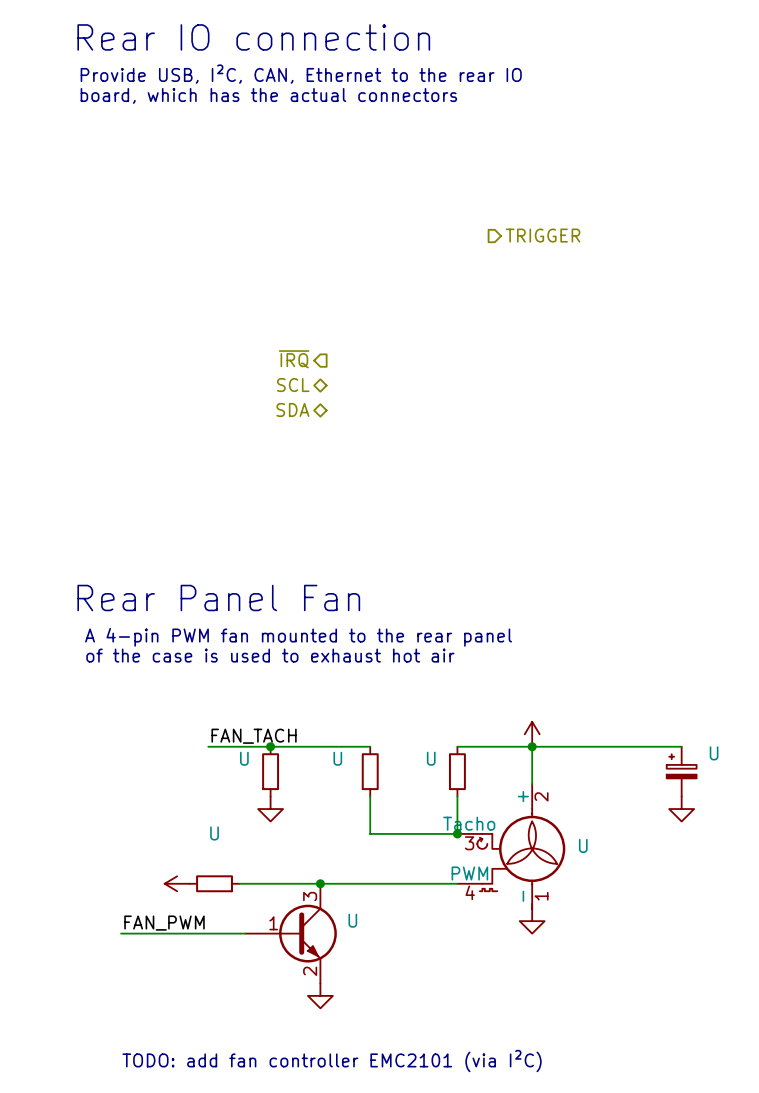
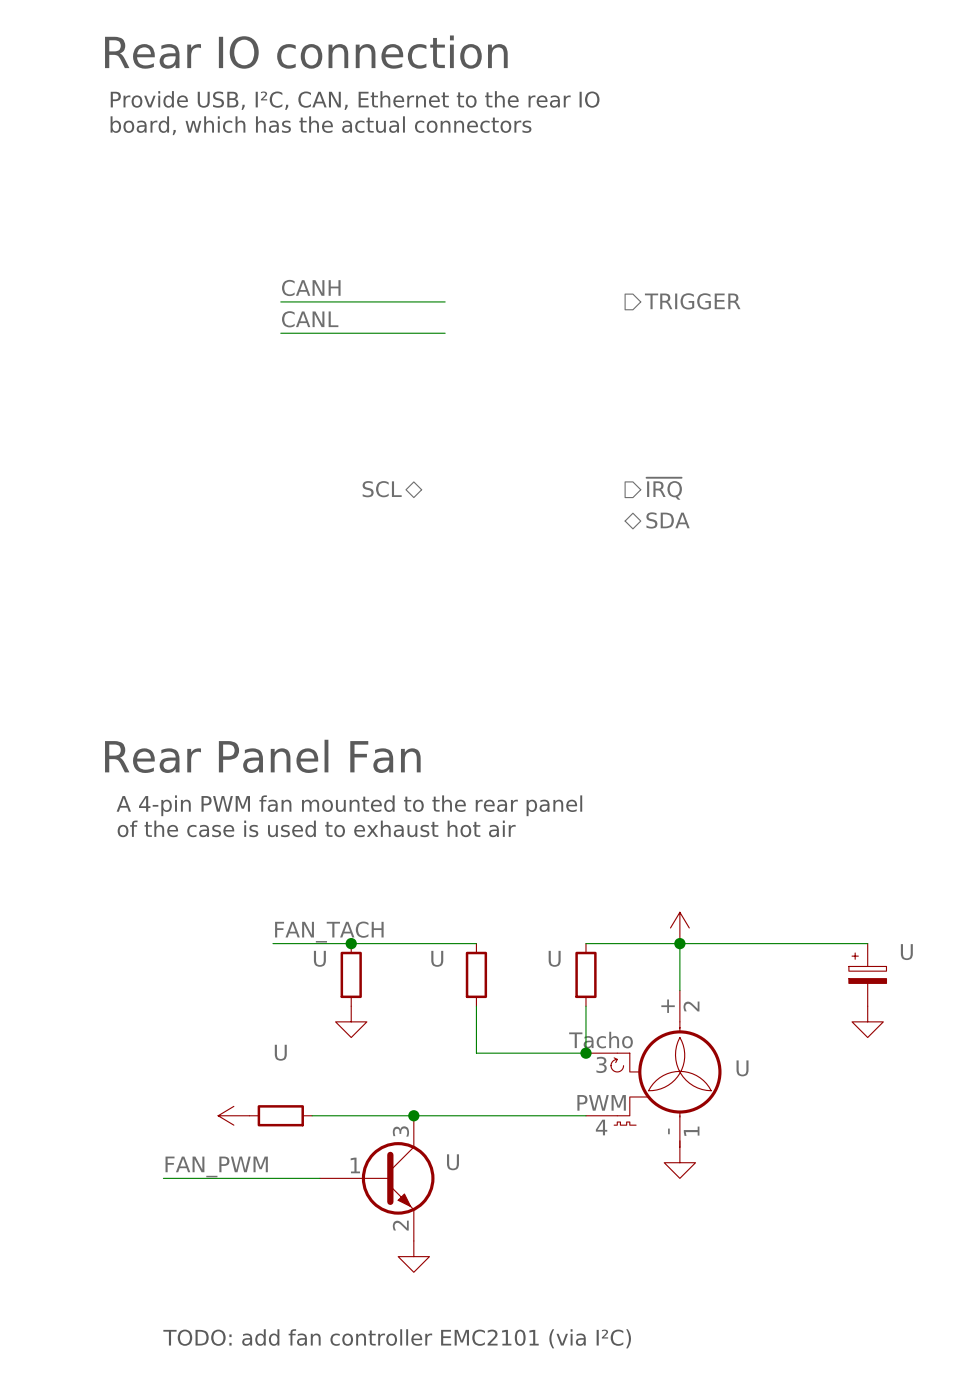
label: none -> CANH (311, 287)
wire: none -> (280, 301) (445, 301)
label: none -> CANL (310, 319)
wire: none -> (280, 333) (445, 333)
hierarchical label rotation: 0° (294, 359) -> 180° (664, 488)
hierarchical label position: ~{IRQ} (294, 359) -> ~{IRQ} (664, 488)
hierarchical label rotation: 0° (292, 409) -> 180° (668, 520)
hierarchical label position: SDA (292, 409) -> SDA (668, 520)

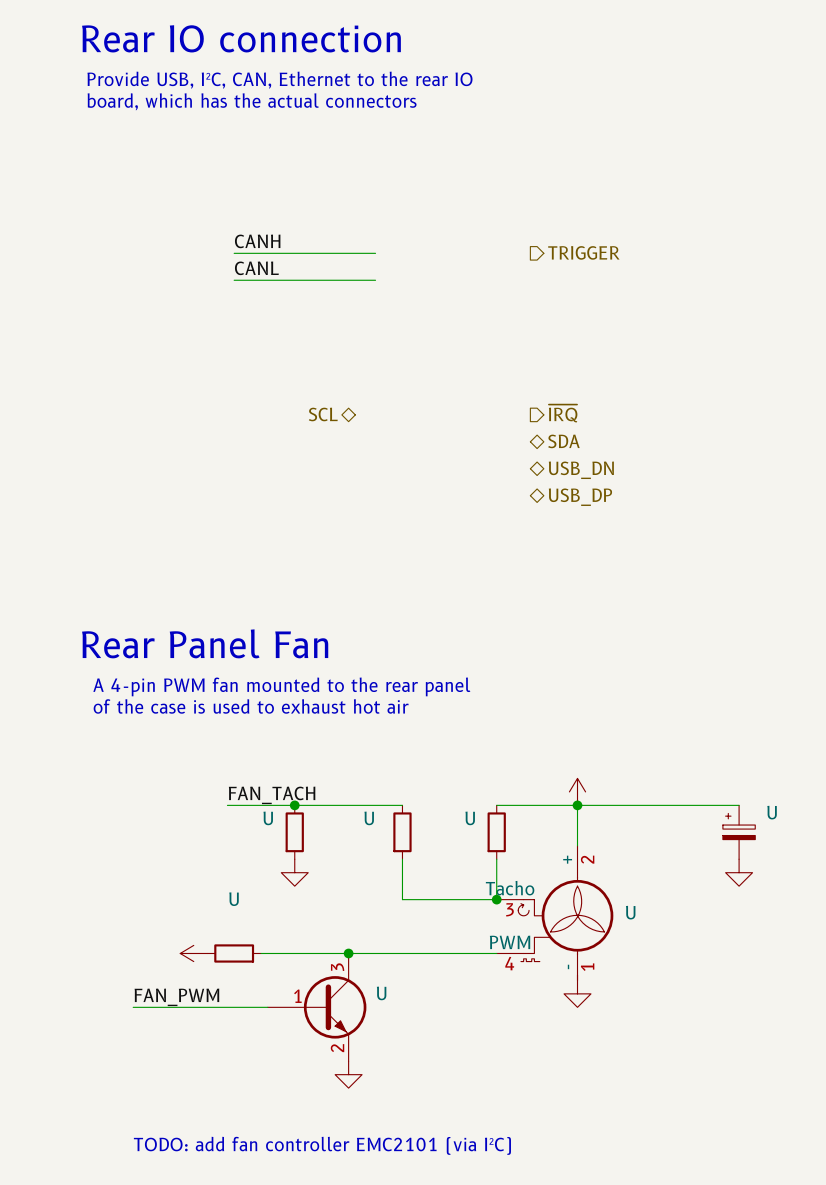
hierarchical label: none -> USB_DN (581, 470)
hierarchical label: none -> USB_DP (580, 497)

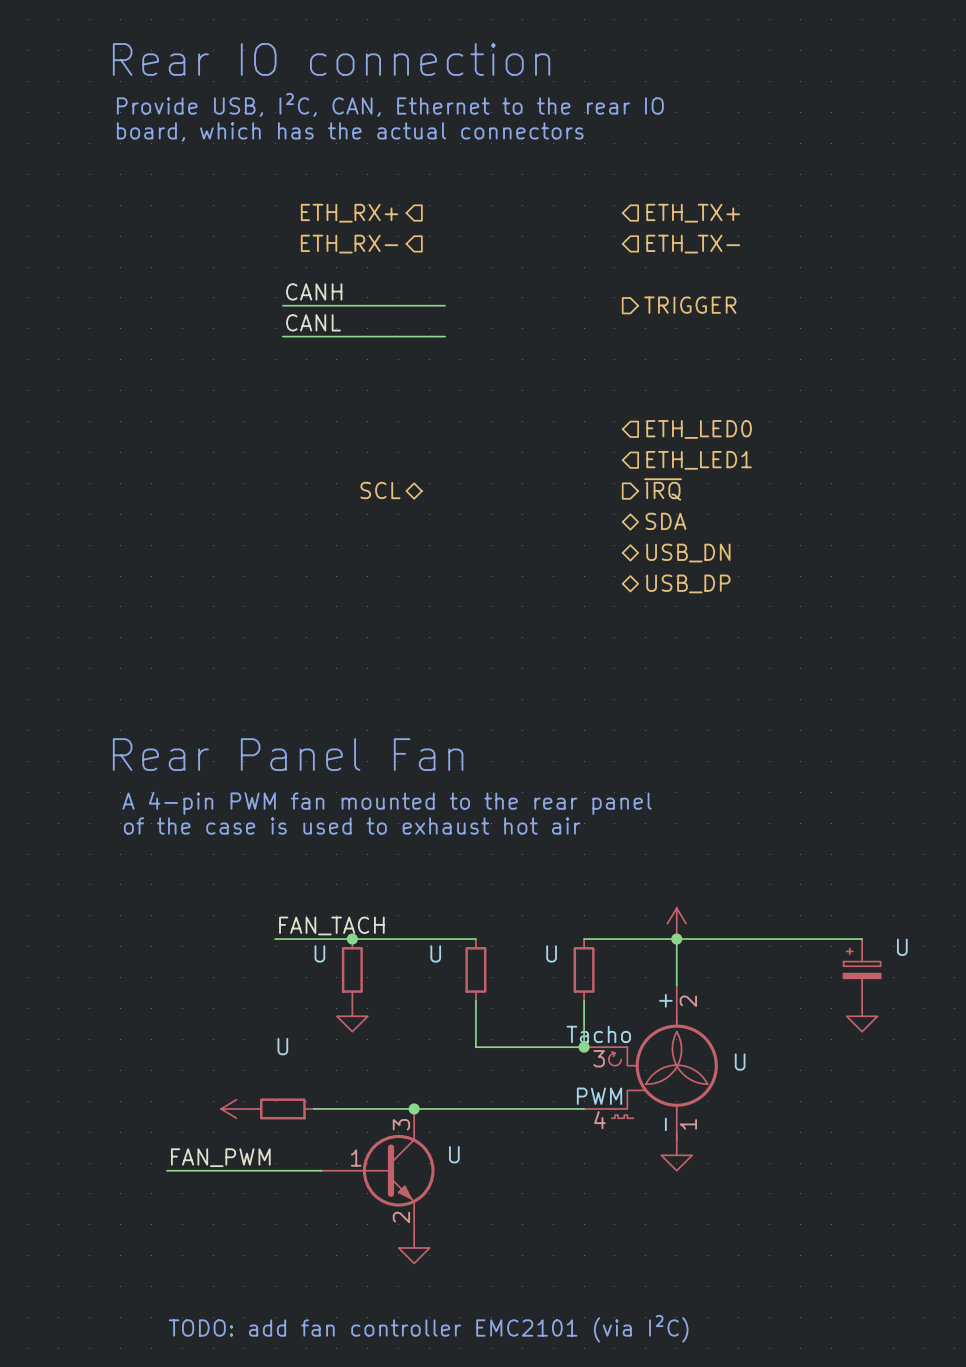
hierarchical label: none -> ETH_RX+ (349, 213)
hierarchical label: none -> ETH_TX+ (693, 213)
hierarchical label: none -> ETH_RX- (349, 244)
hierarchical label: none -> ETH_TX- (693, 244)
hierarchical label: none -> ETH_LED0 (699, 429)
hierarchical label: none -> ETH_LED1 (699, 460)

